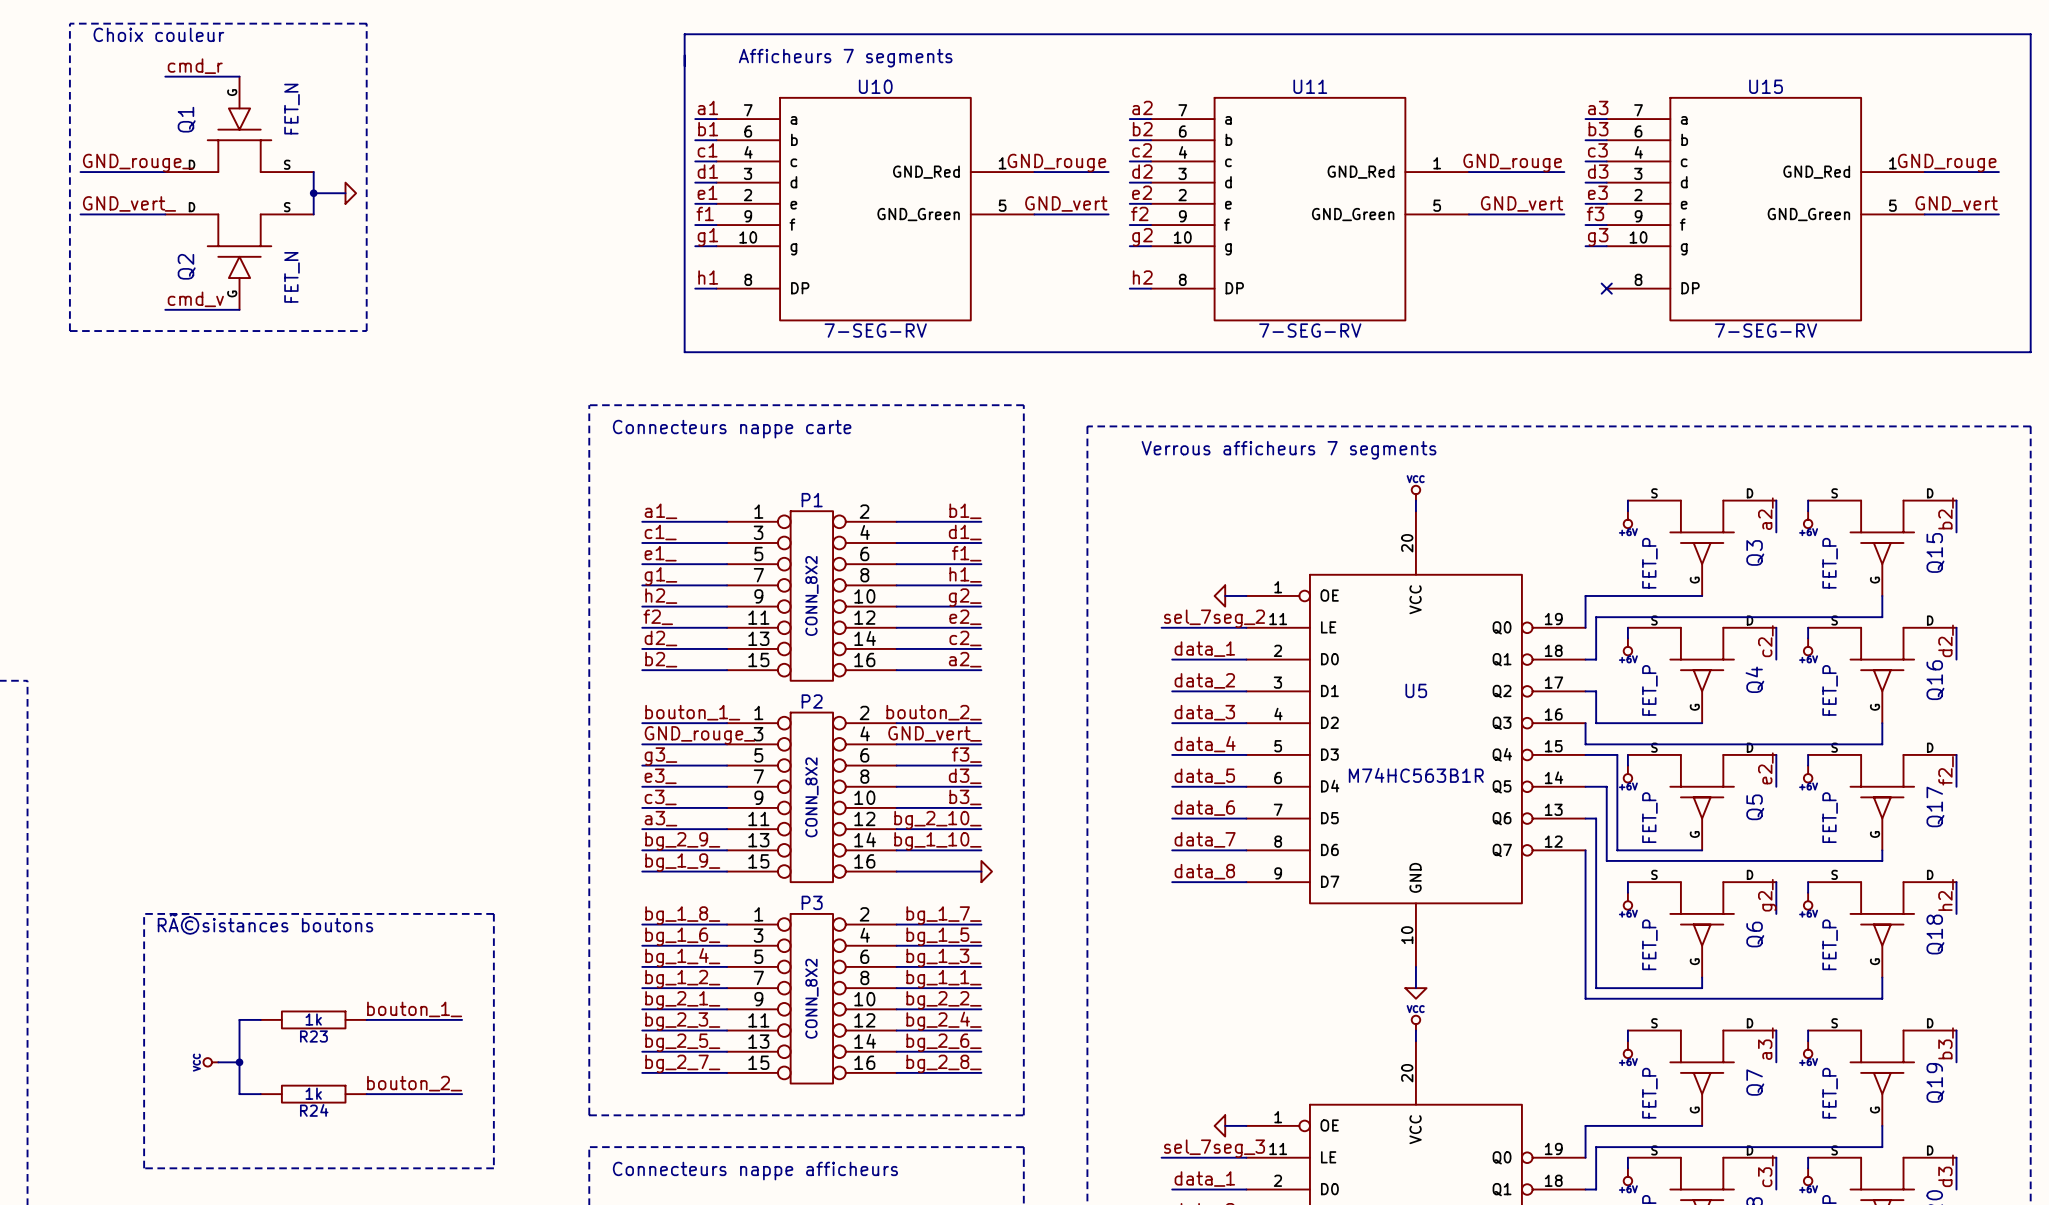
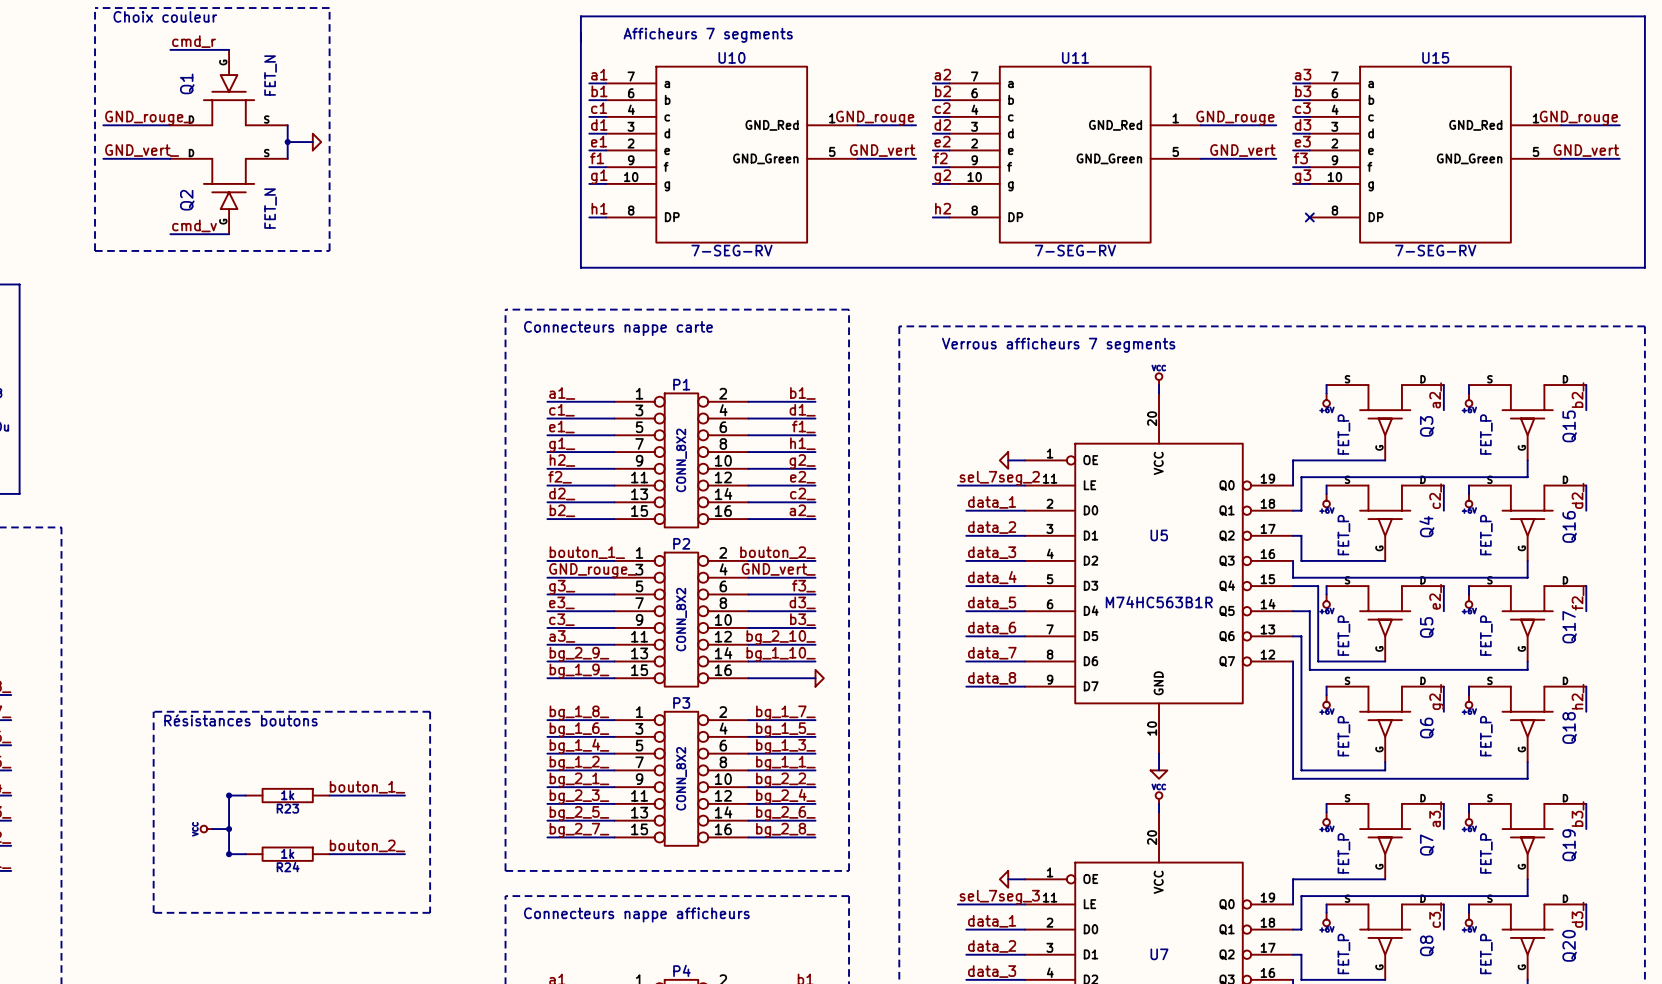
text: RÃ©sistances boutons (265, 924) -> Résistances boutons (240, 720)
junction: none -> (229, 795)
junction: none -> (229, 854)

